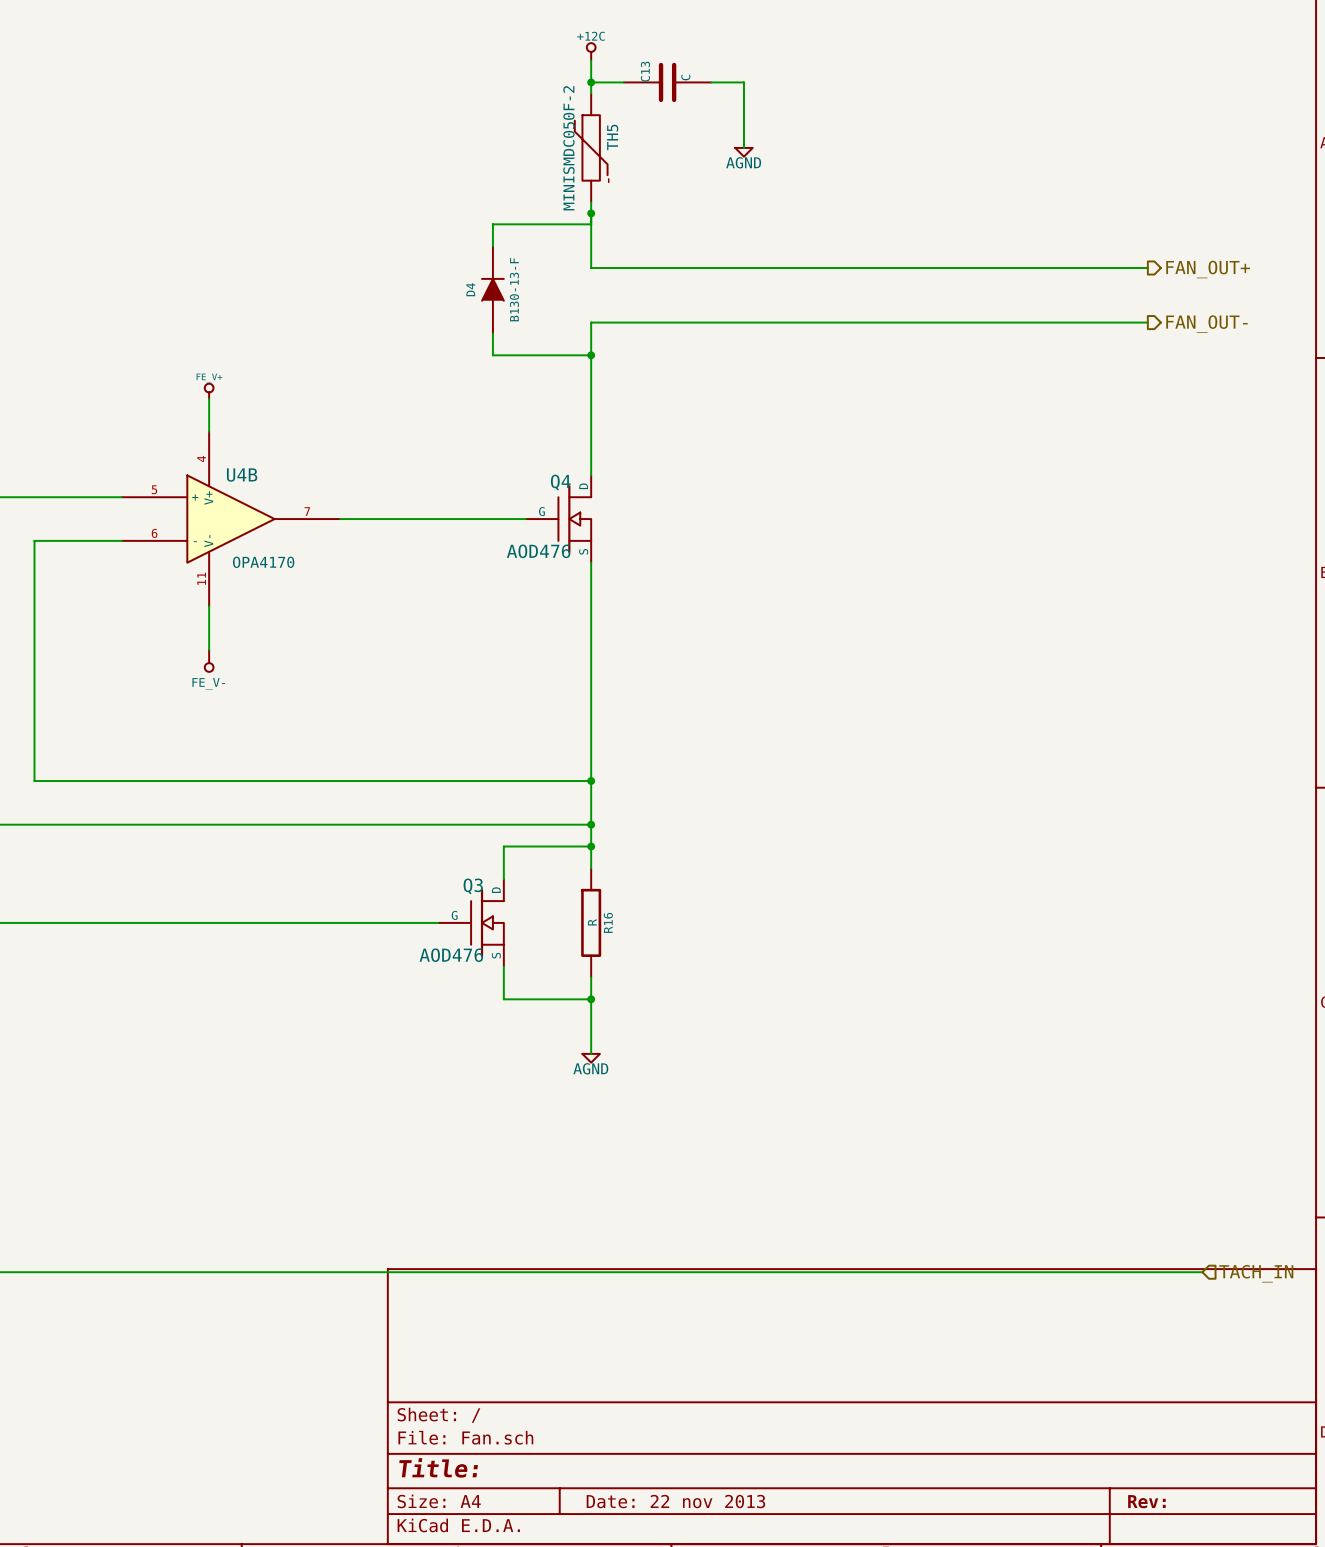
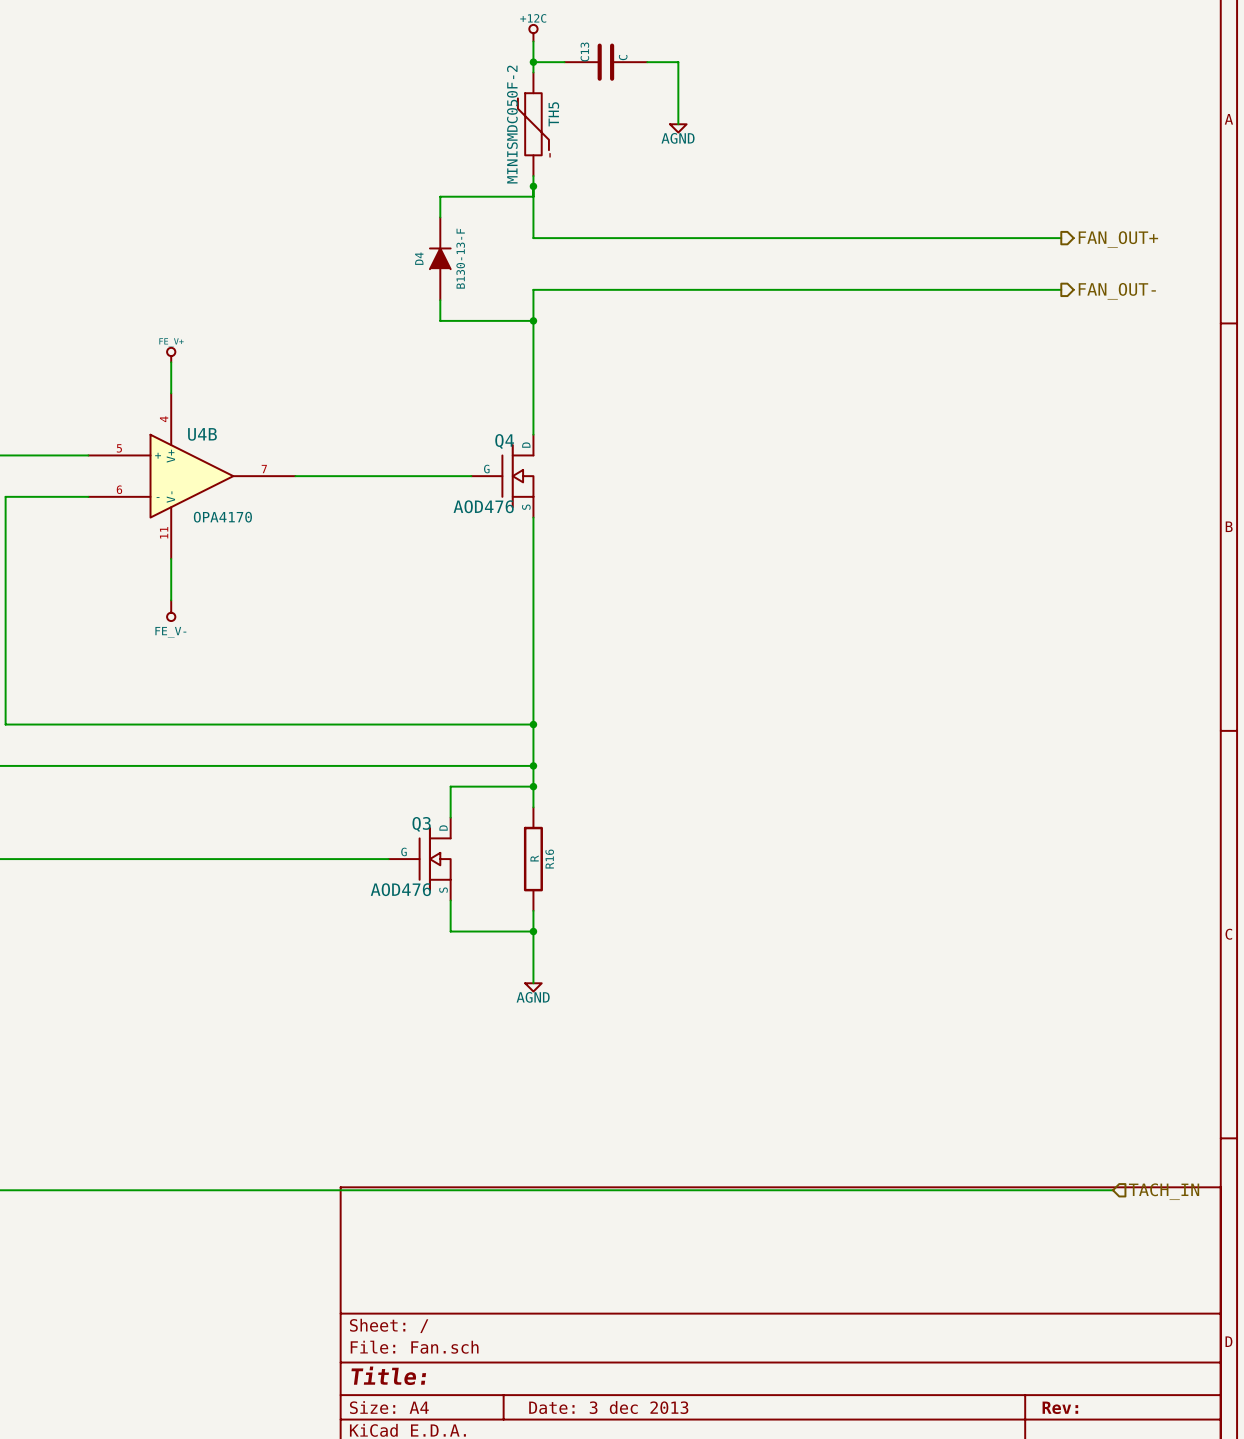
title block: Date: 22 nov 2013 (675, 1501) -> Date: 3 dec 2013 (608, 1407)

